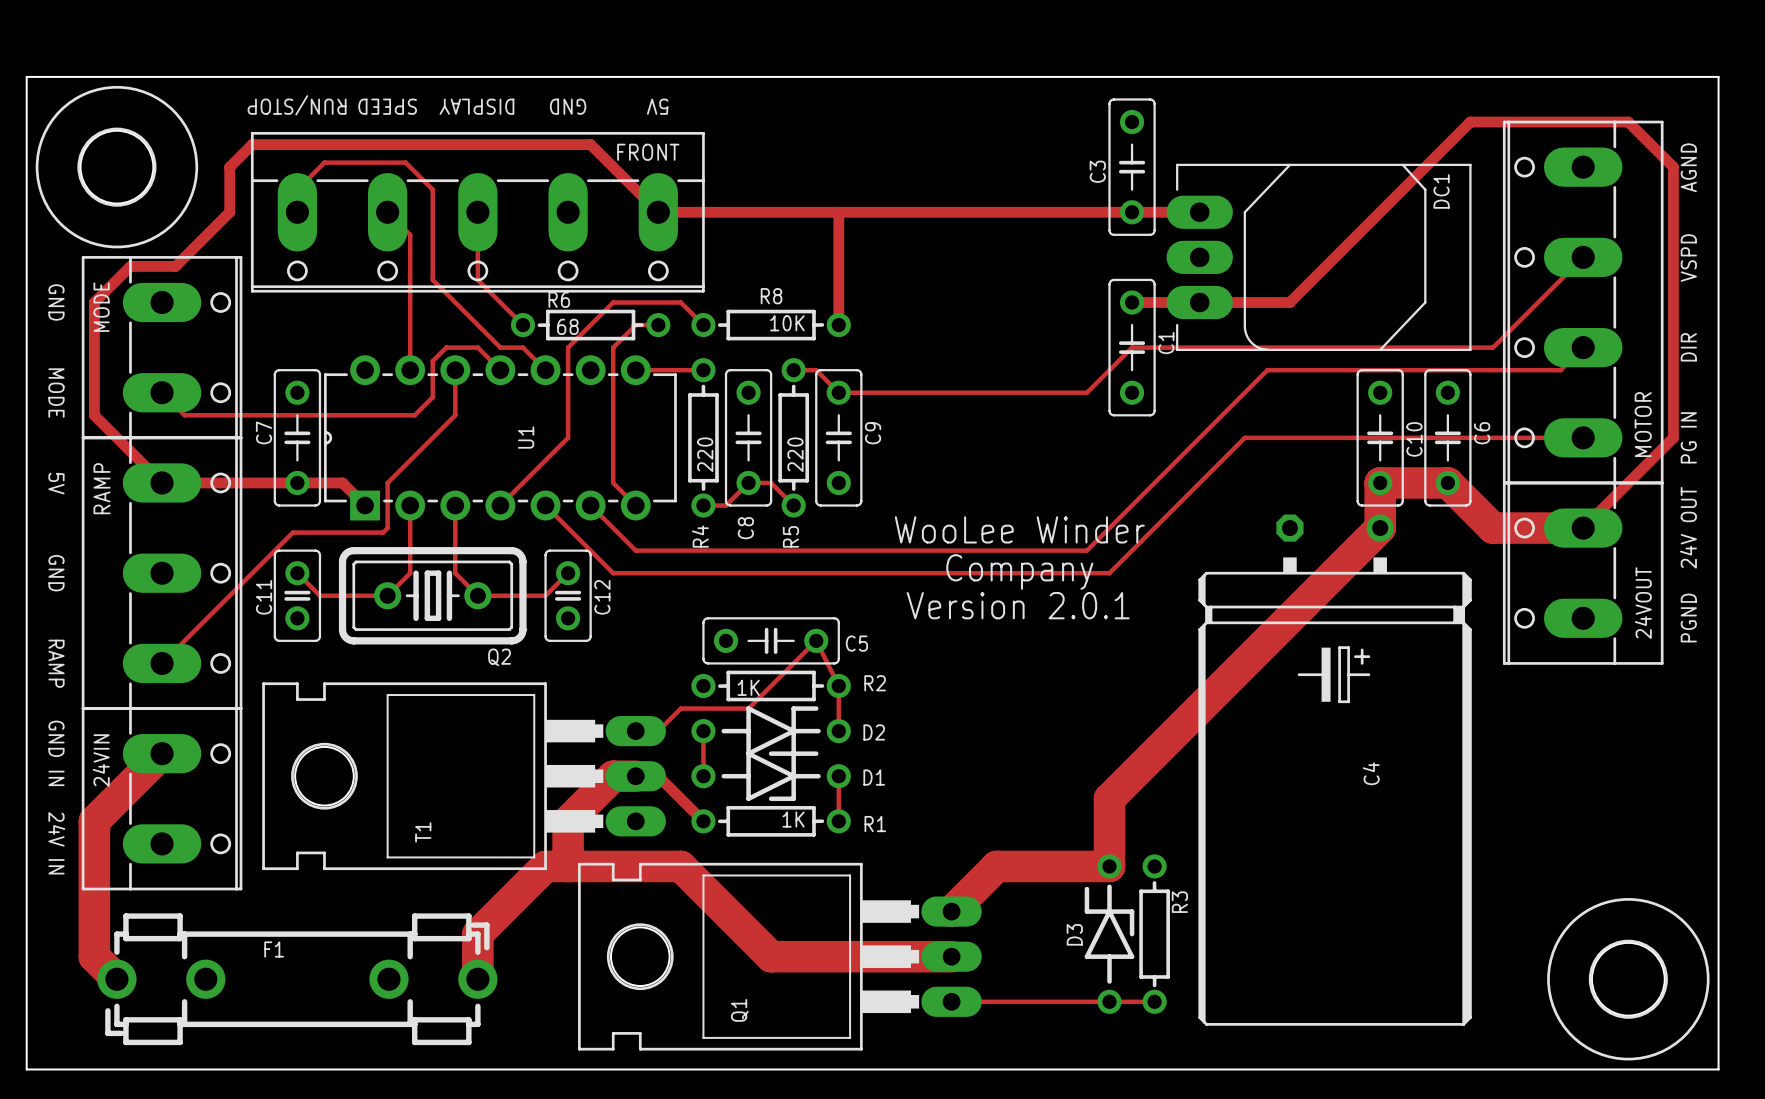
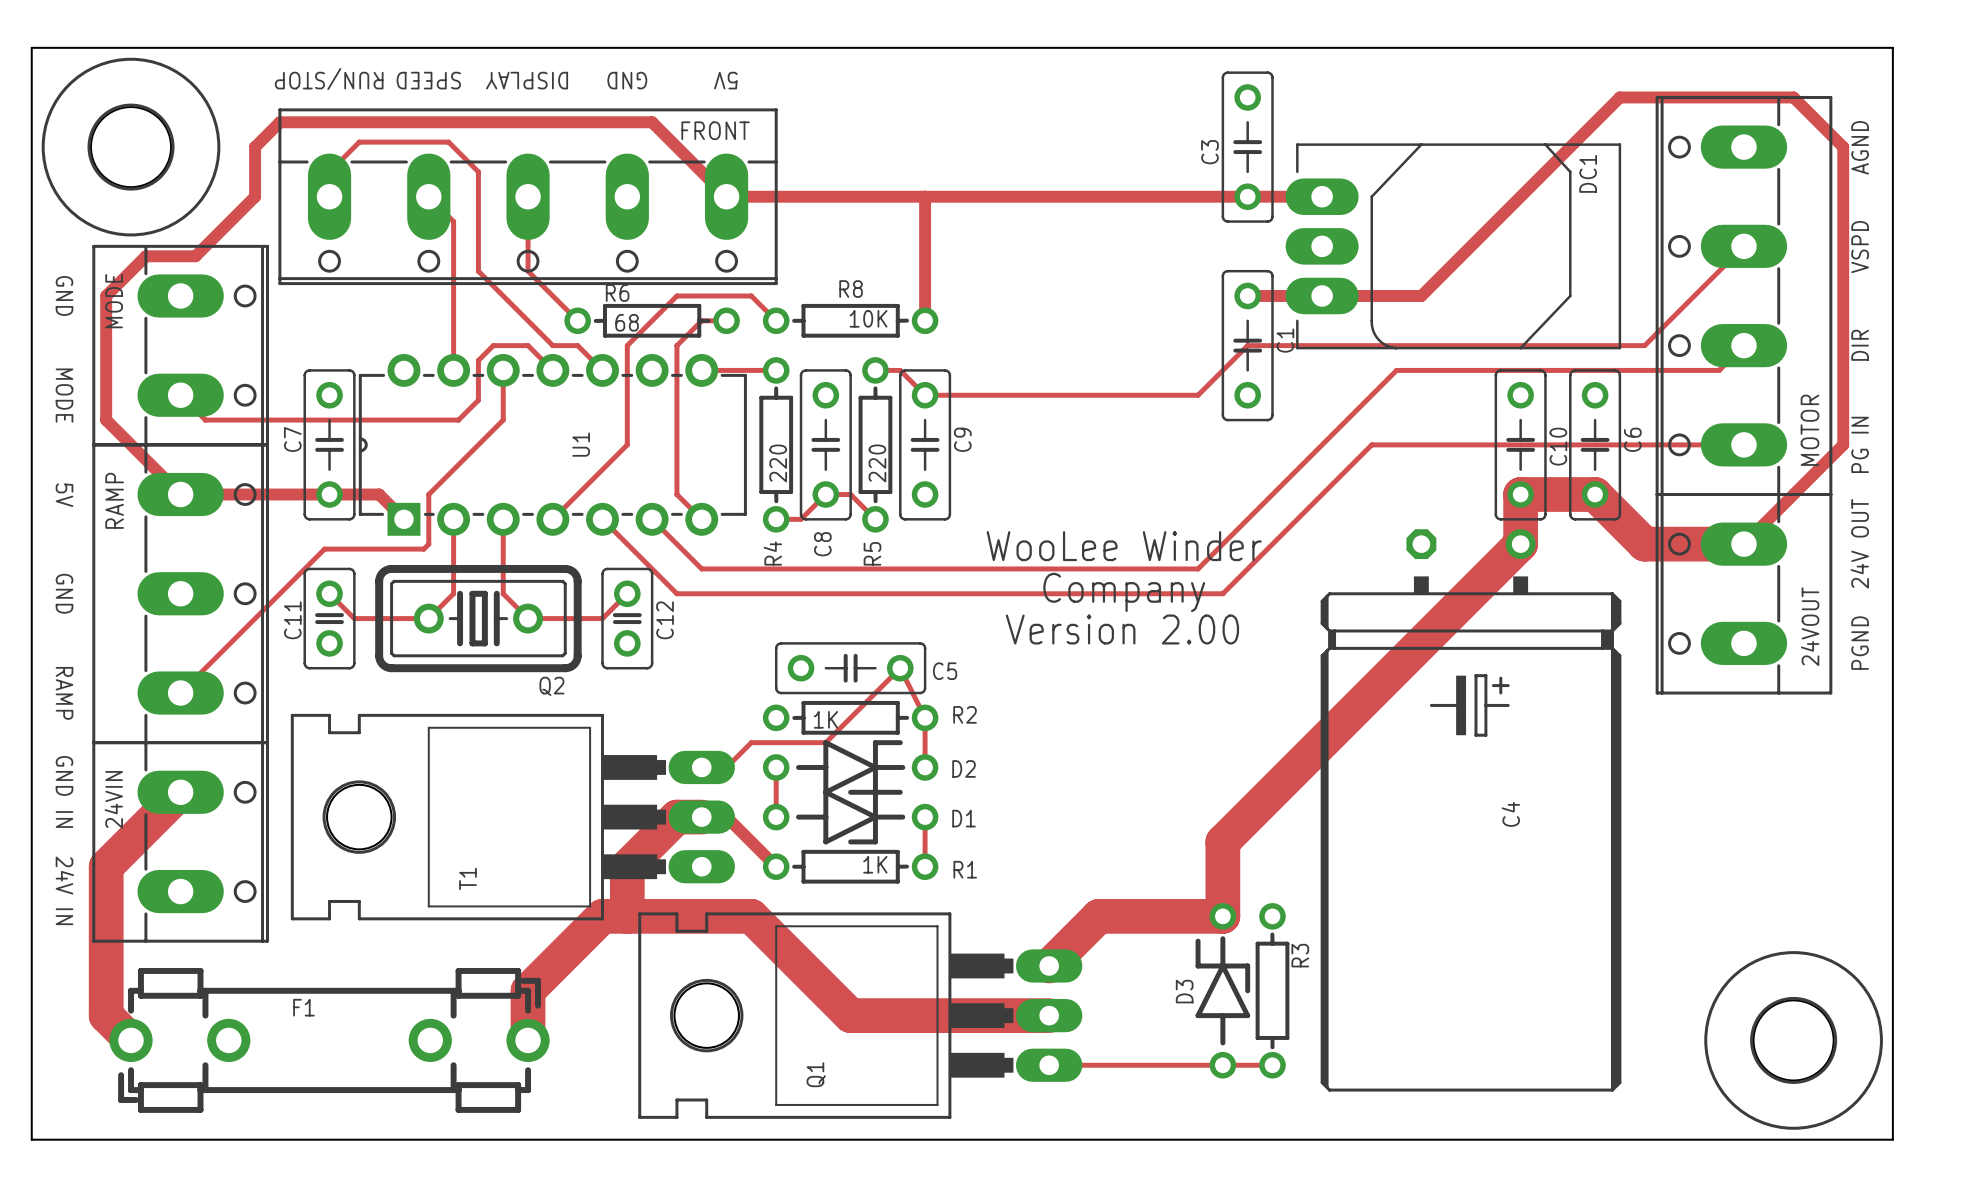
text: Version 2.0.1 (1018, 605) -> Version 2.00 (1122, 629)

